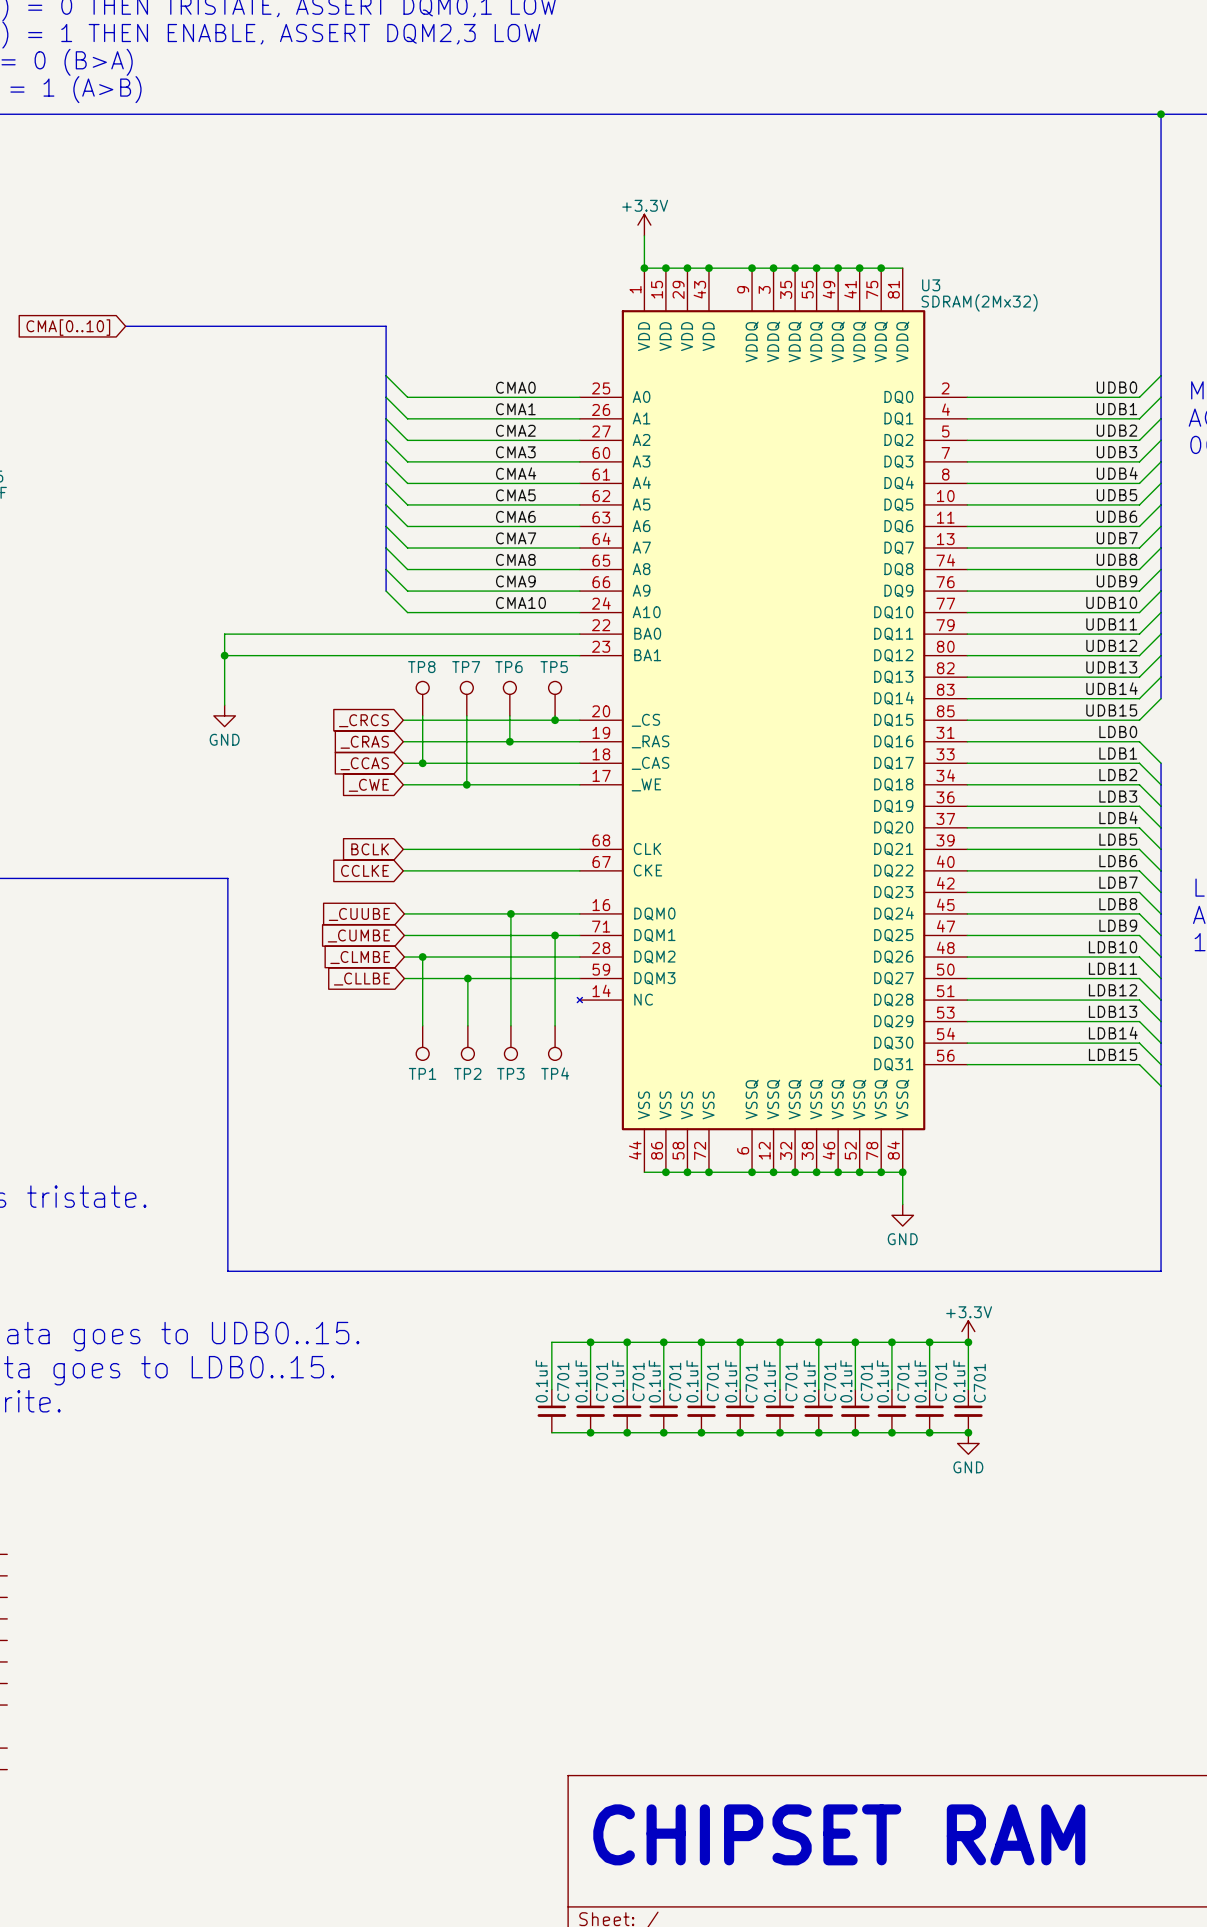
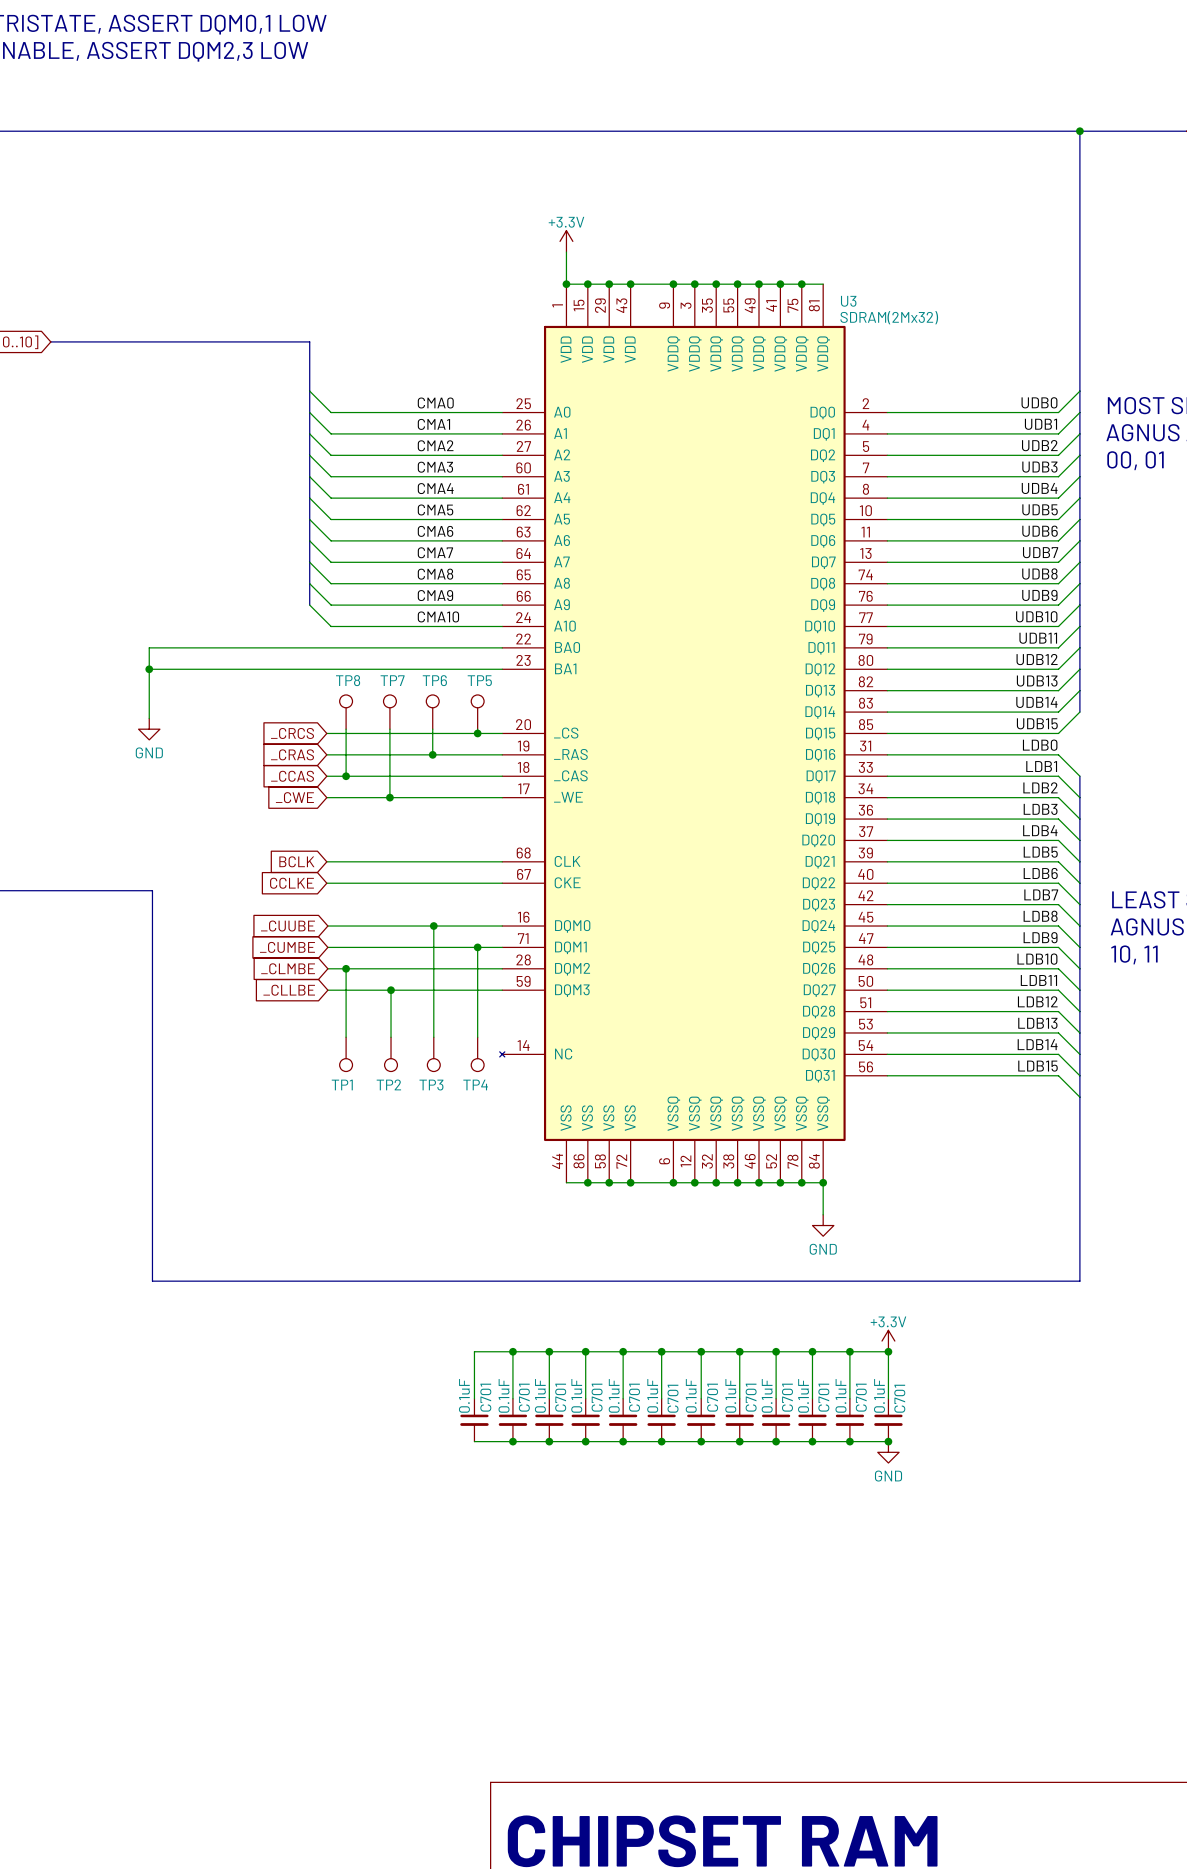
U3 symbol: [577, 268, 968, 1173] -> [499, 284, 888, 1183]

